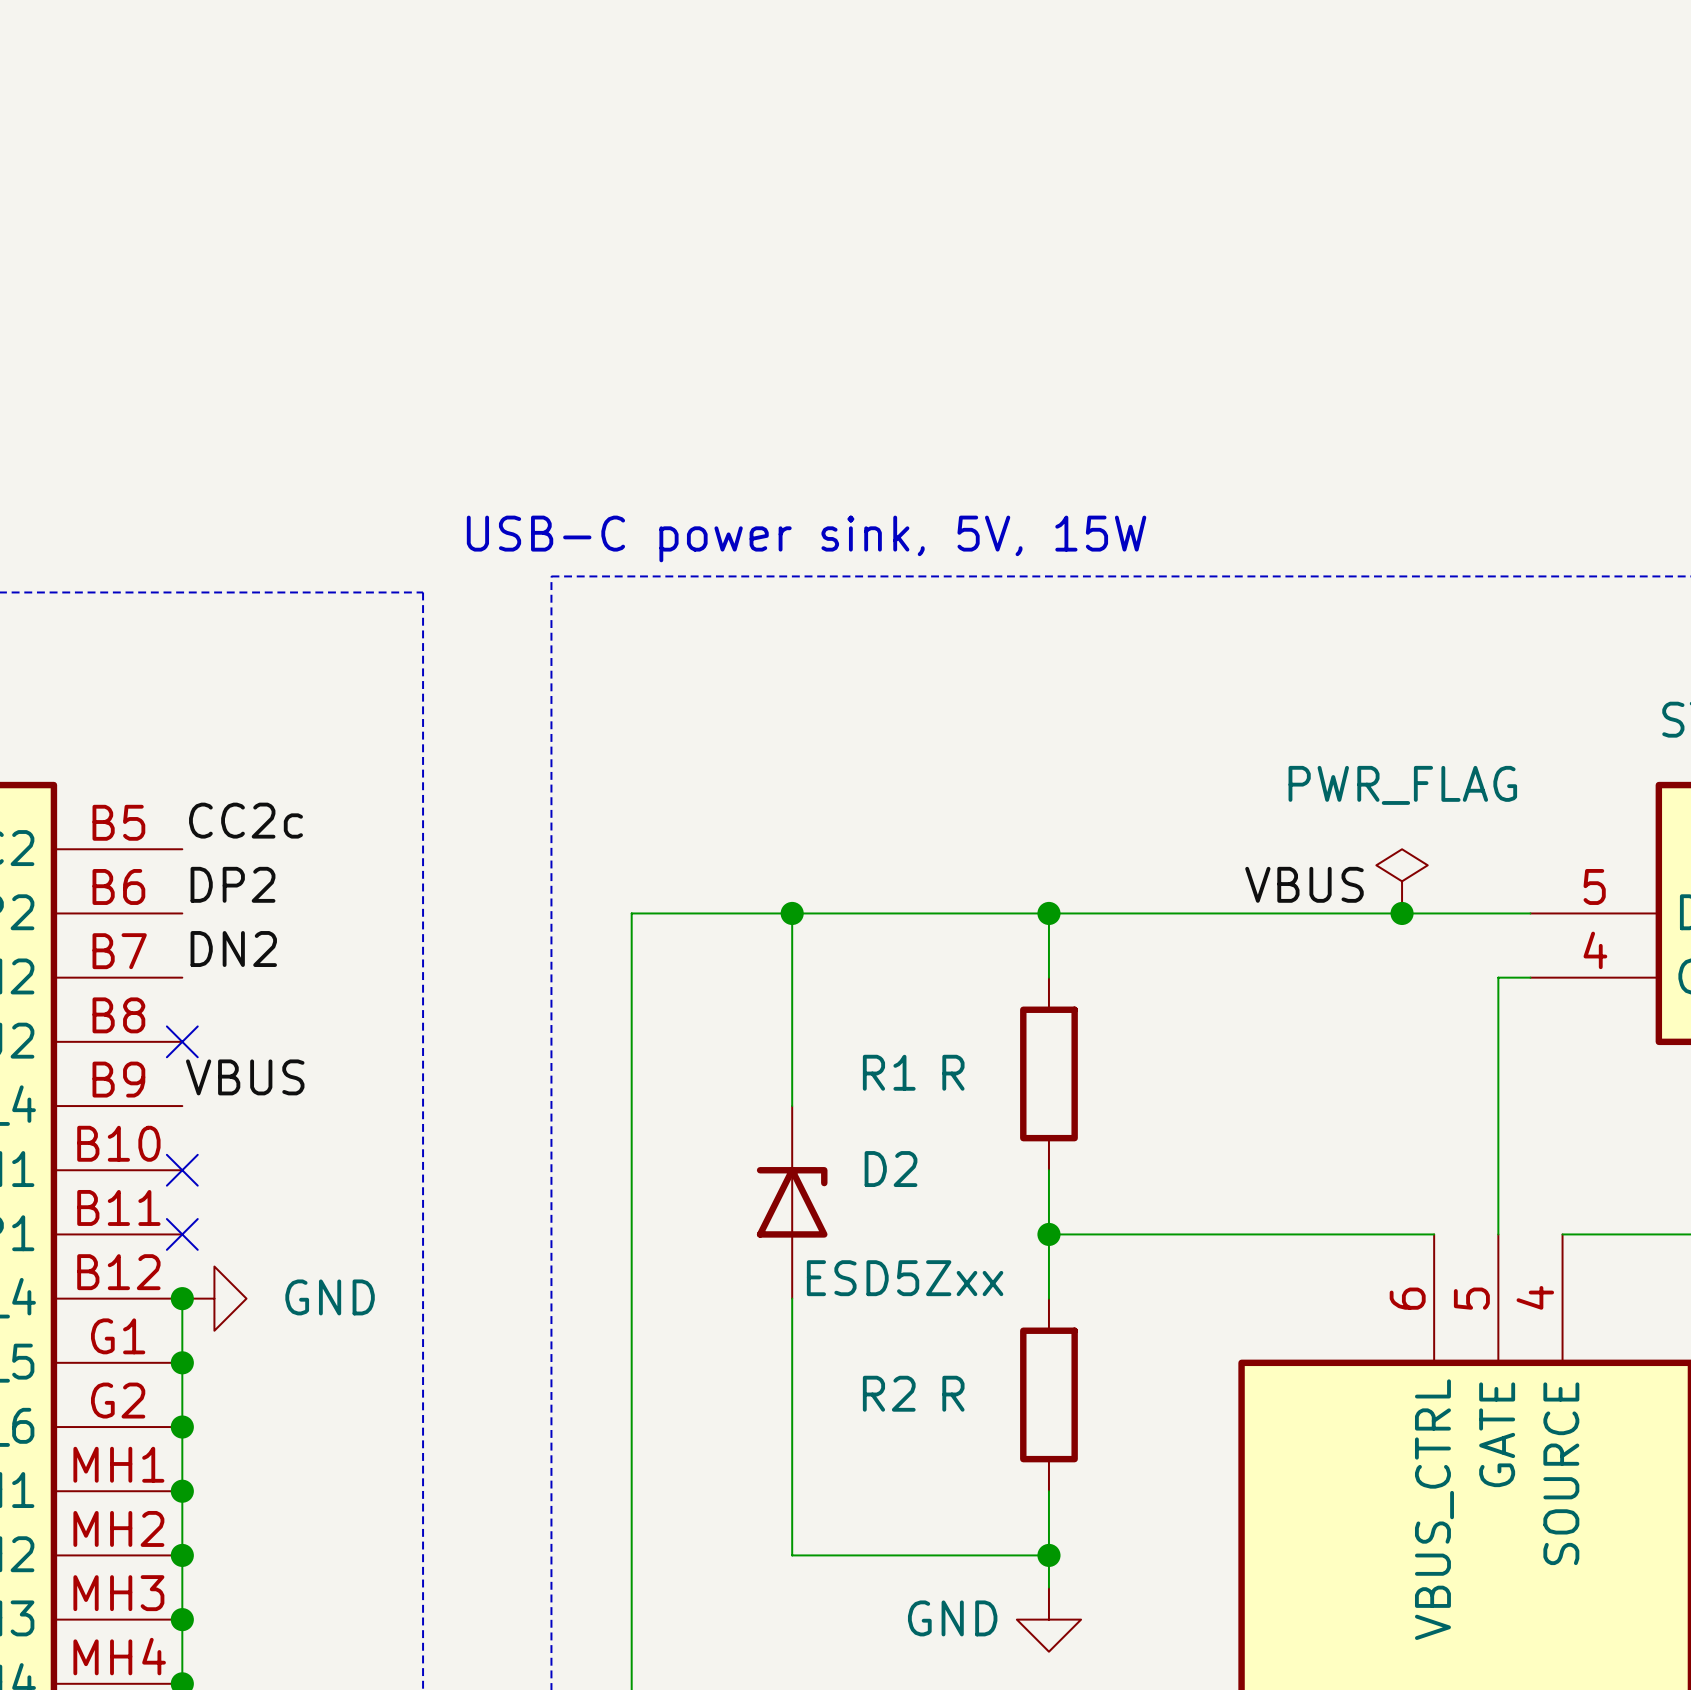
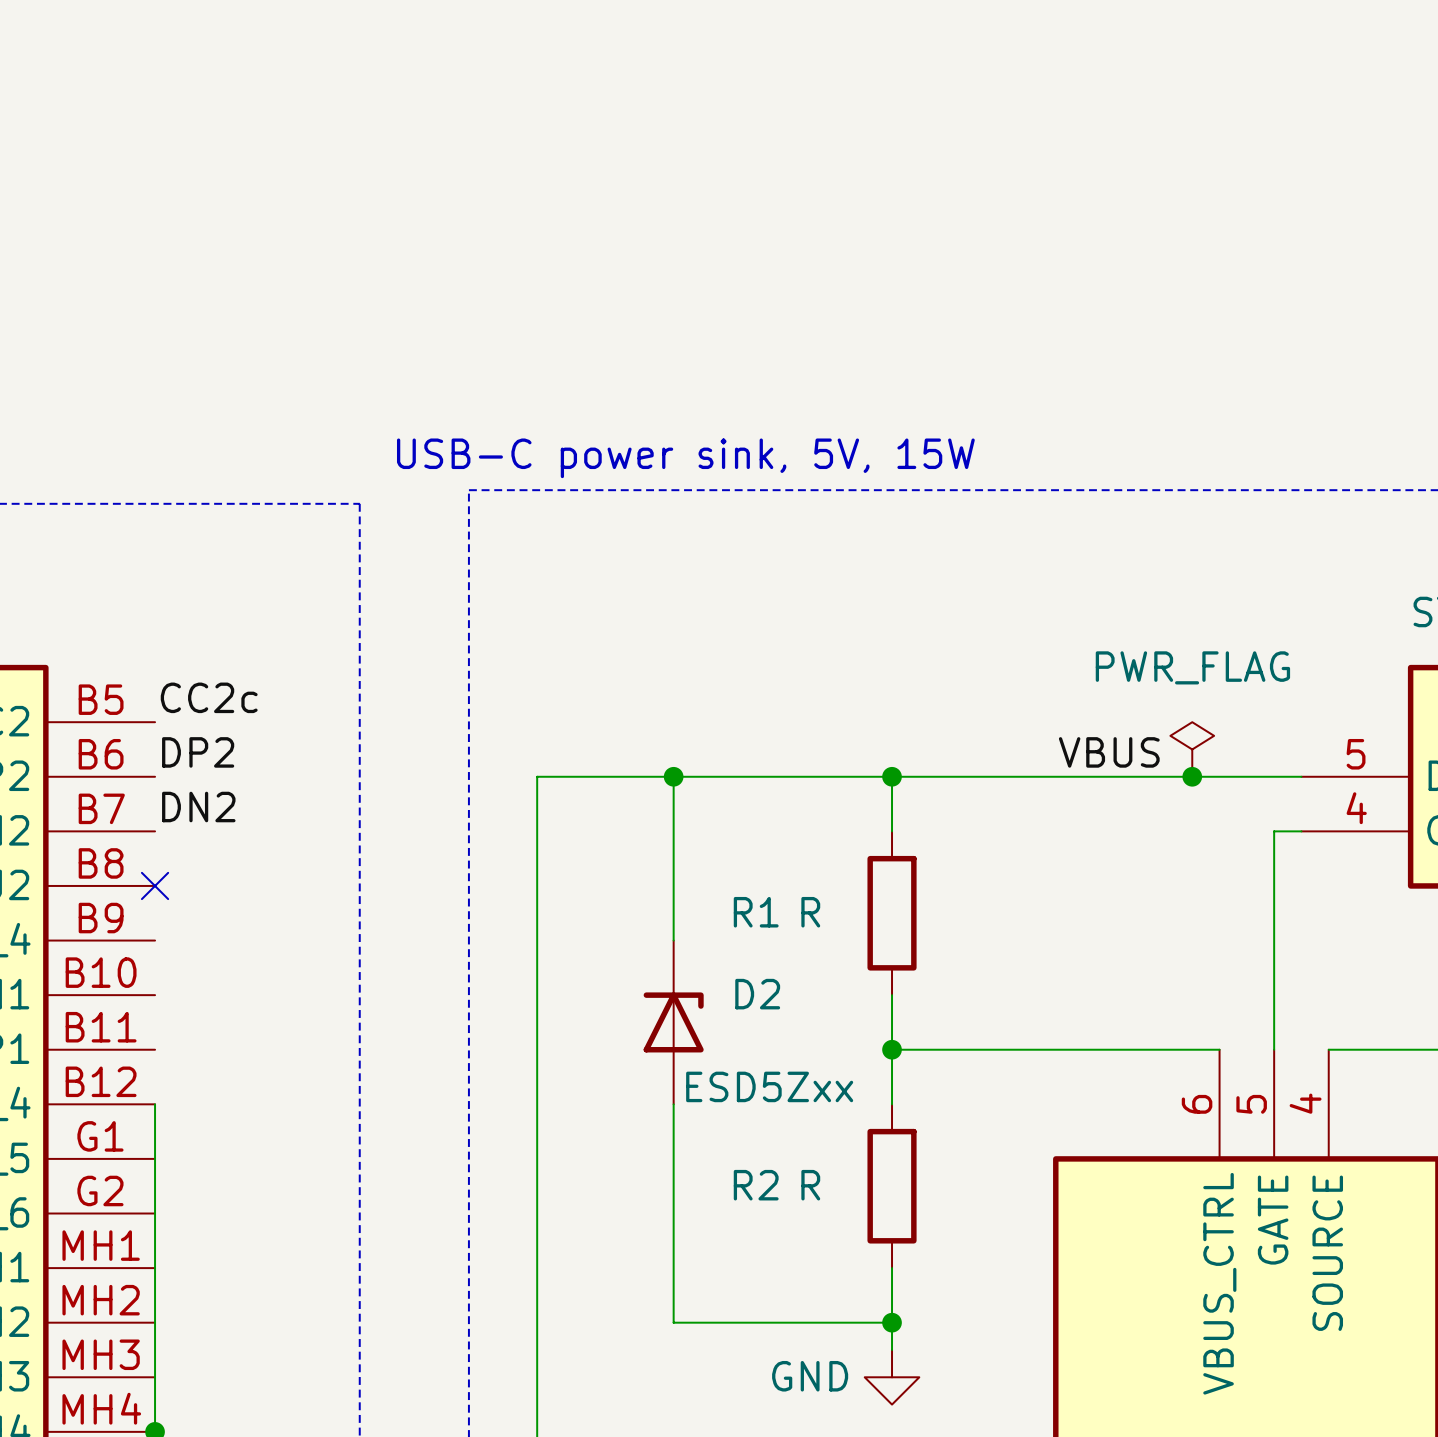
label: VBUS (245, 1077) -> none
no-connect mark: (182, 1170) -> none
no-connect mark: (182, 1234) -> none
junction: (182, 1298) -> none
power symbol: GND (214, 1298) -> none
junction: (182, 1362) -> none
junction: (182, 1427) -> none
junction: (182, 1491) -> none
junction: (182, 1555) -> none
junction: (182, 1619) -> none

